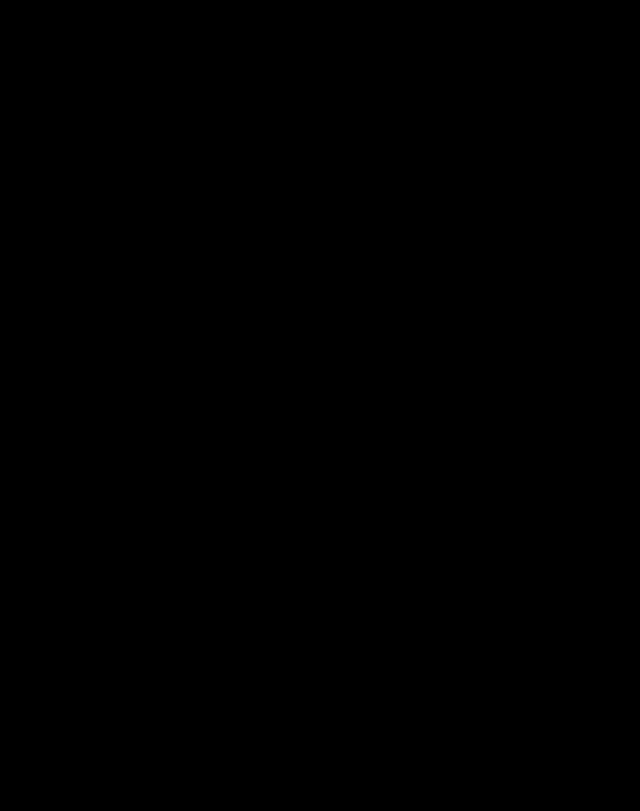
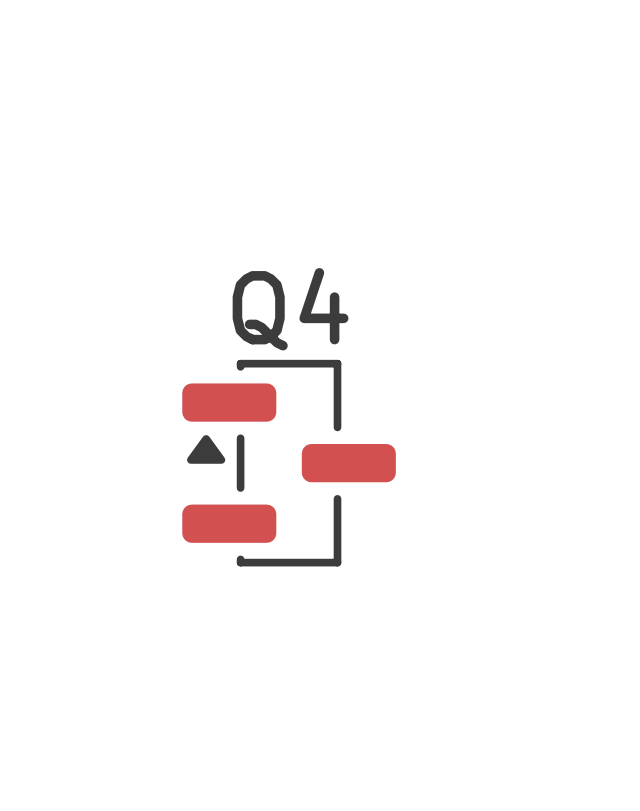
Q4: none -> (289, 463)

